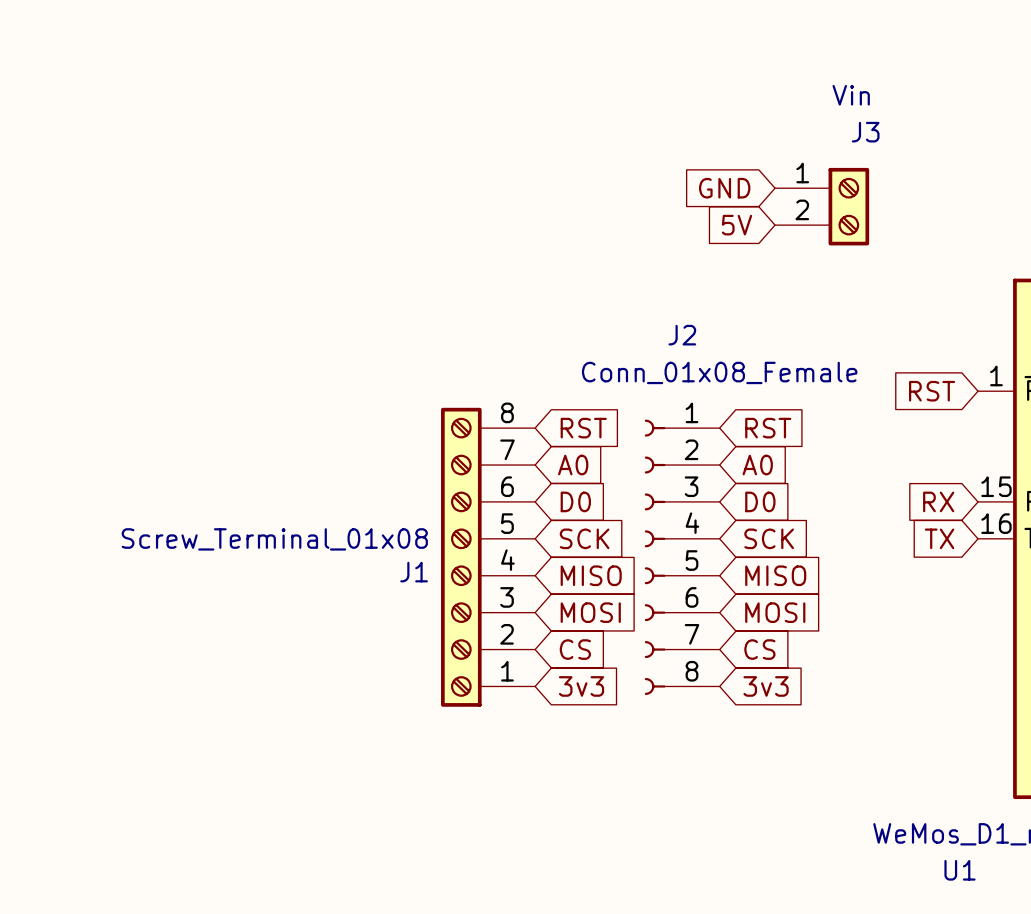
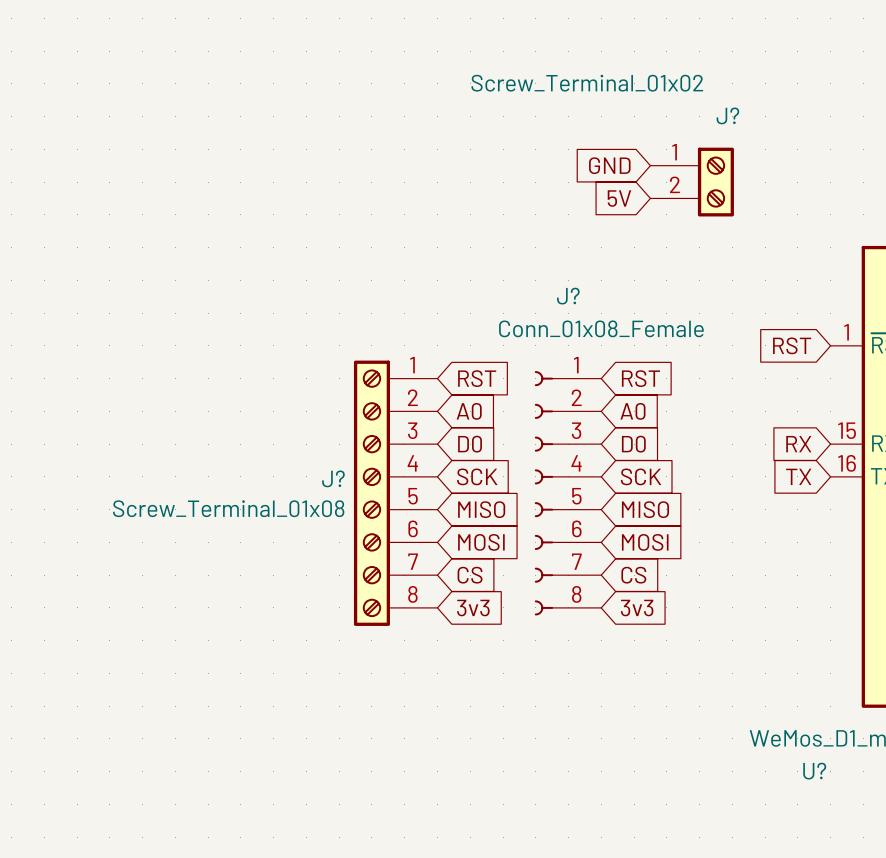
J3 value: Vin (851, 95) -> Screw_Terminal_01x02 (587, 83)
J3 name: J3 (865, 132) -> J? (727, 115)
J2 name: J2 (682, 335) -> J? (568, 296)
J1: Screw_Terminal_01x08 (488, 557) -> none
J?: none -> Screw_Terminal_01x08 (395, 493)
U1 name: U1 (960, 870) -> U? (814, 771)

